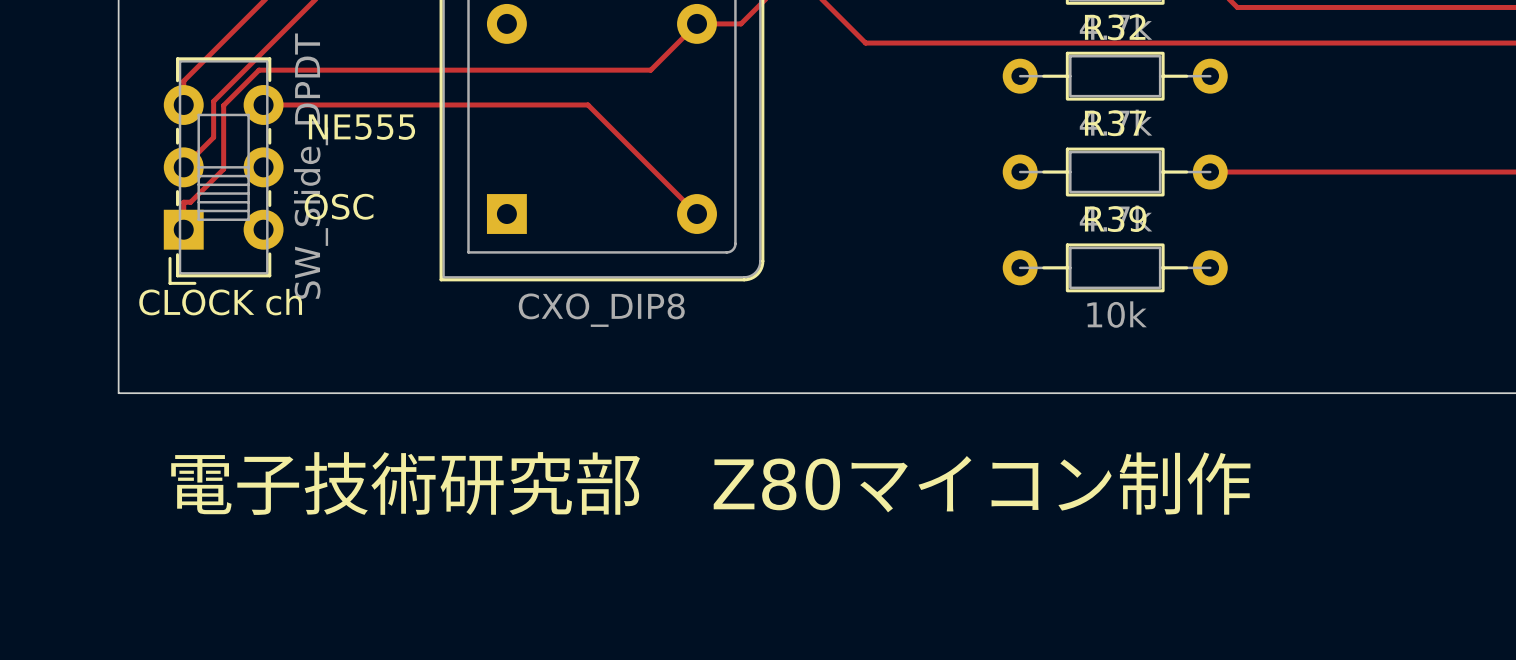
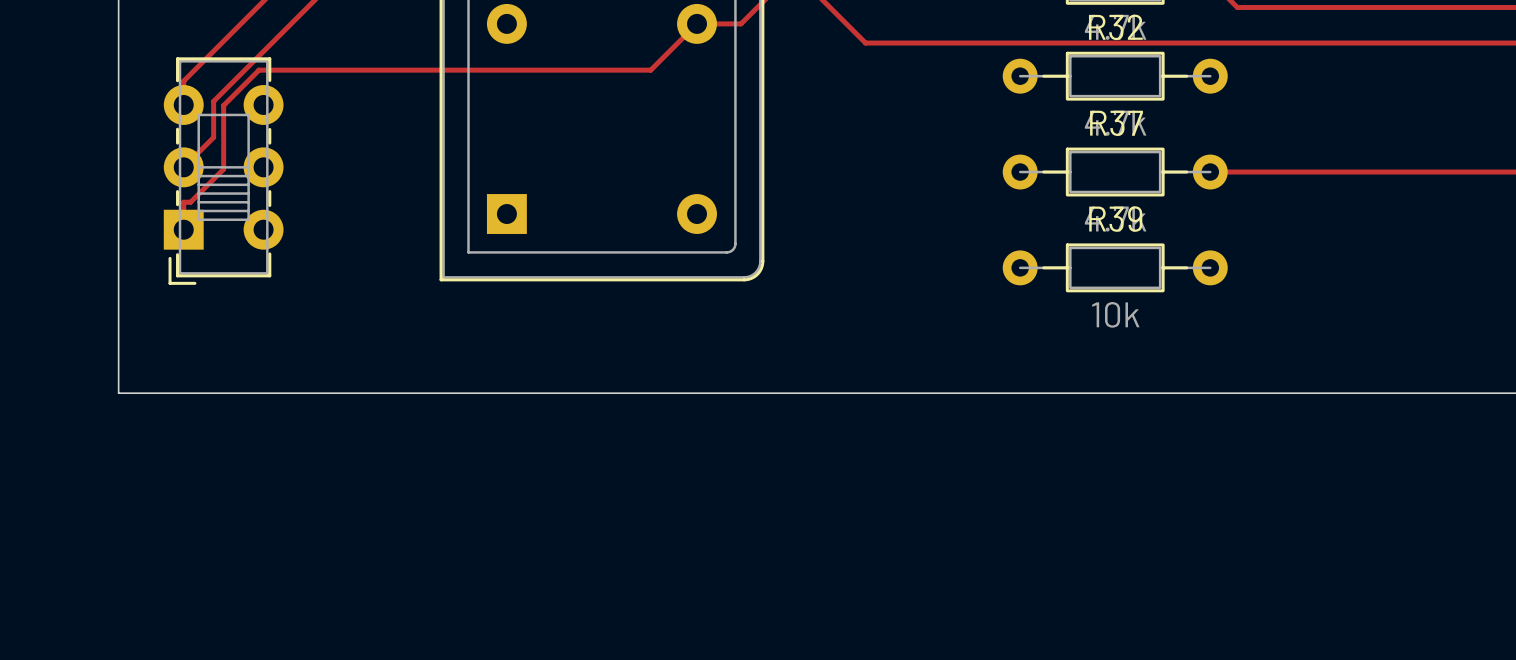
track: (263, 104) (587, 104) (697, 214) -> none
text: NE555 (361, 127) -> none
CLOCK ch value: SW_Slide_DPDT (311, 166) -> none
text: OSC (339, 206) -> none
CLOCK ch name: CLOCK ch (220, 302) -> none
part value: CXO_DIP8 (601, 310) -> none
text: 電子技術研究部 Z80マイコン制作 (710, 483) -> none

